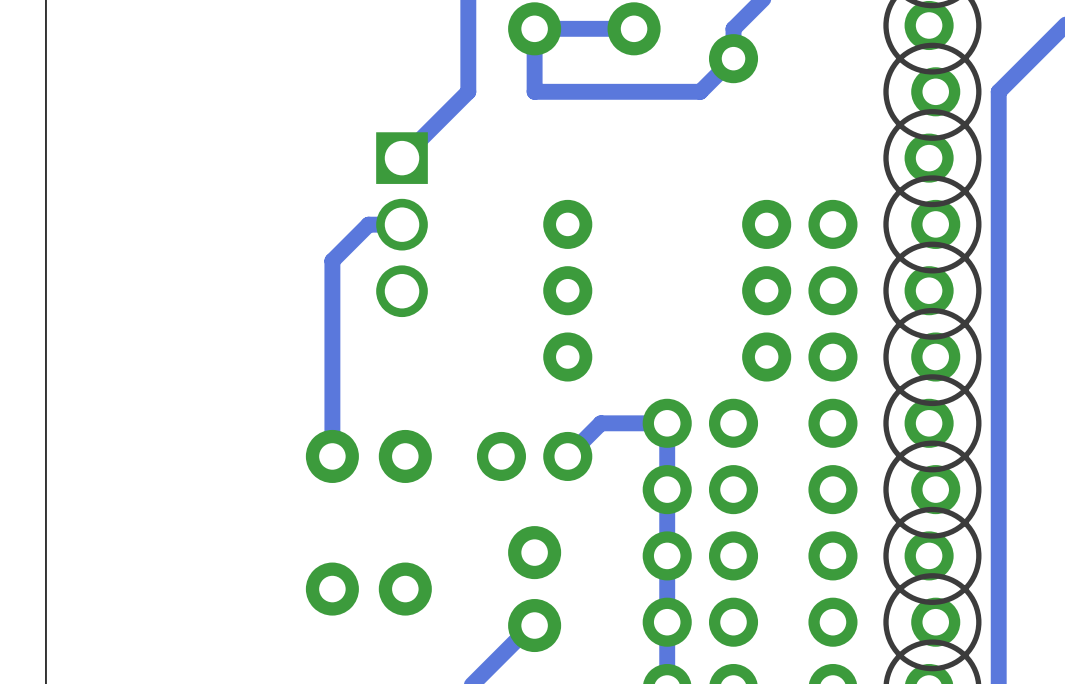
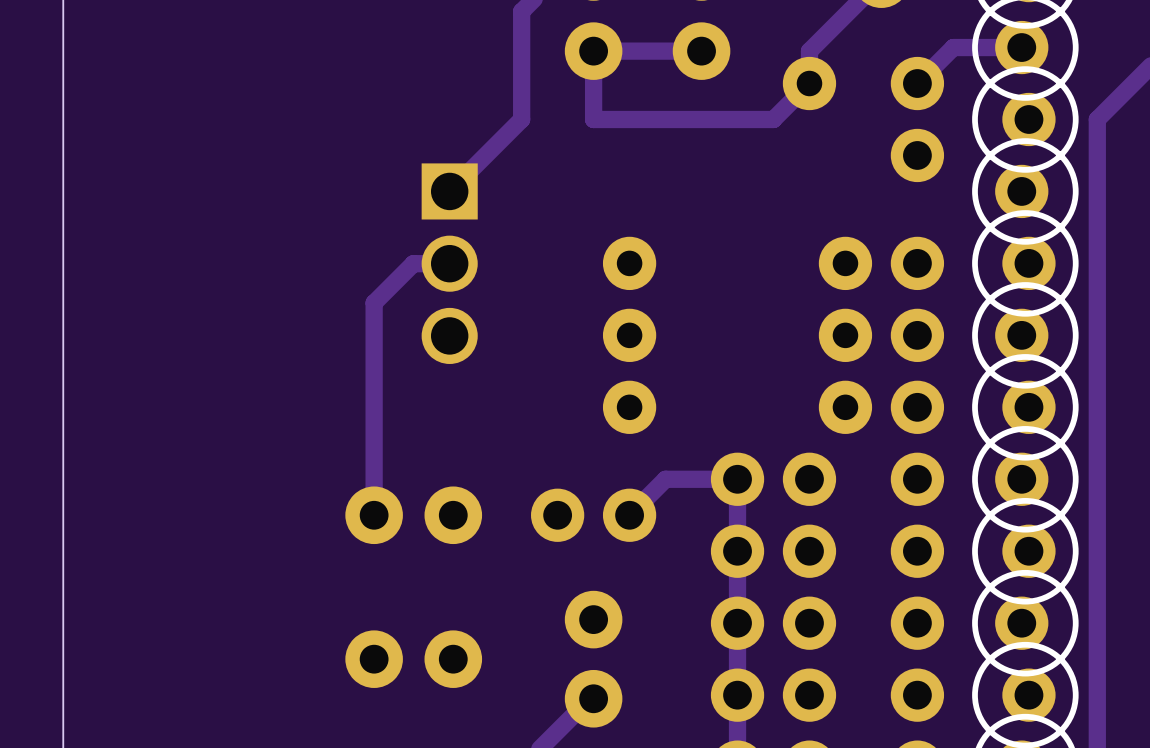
track: none -> (1021, 47) (953, 47) (917, 83)
part: none -> (917, 83)
part: none -> (917, 155)

